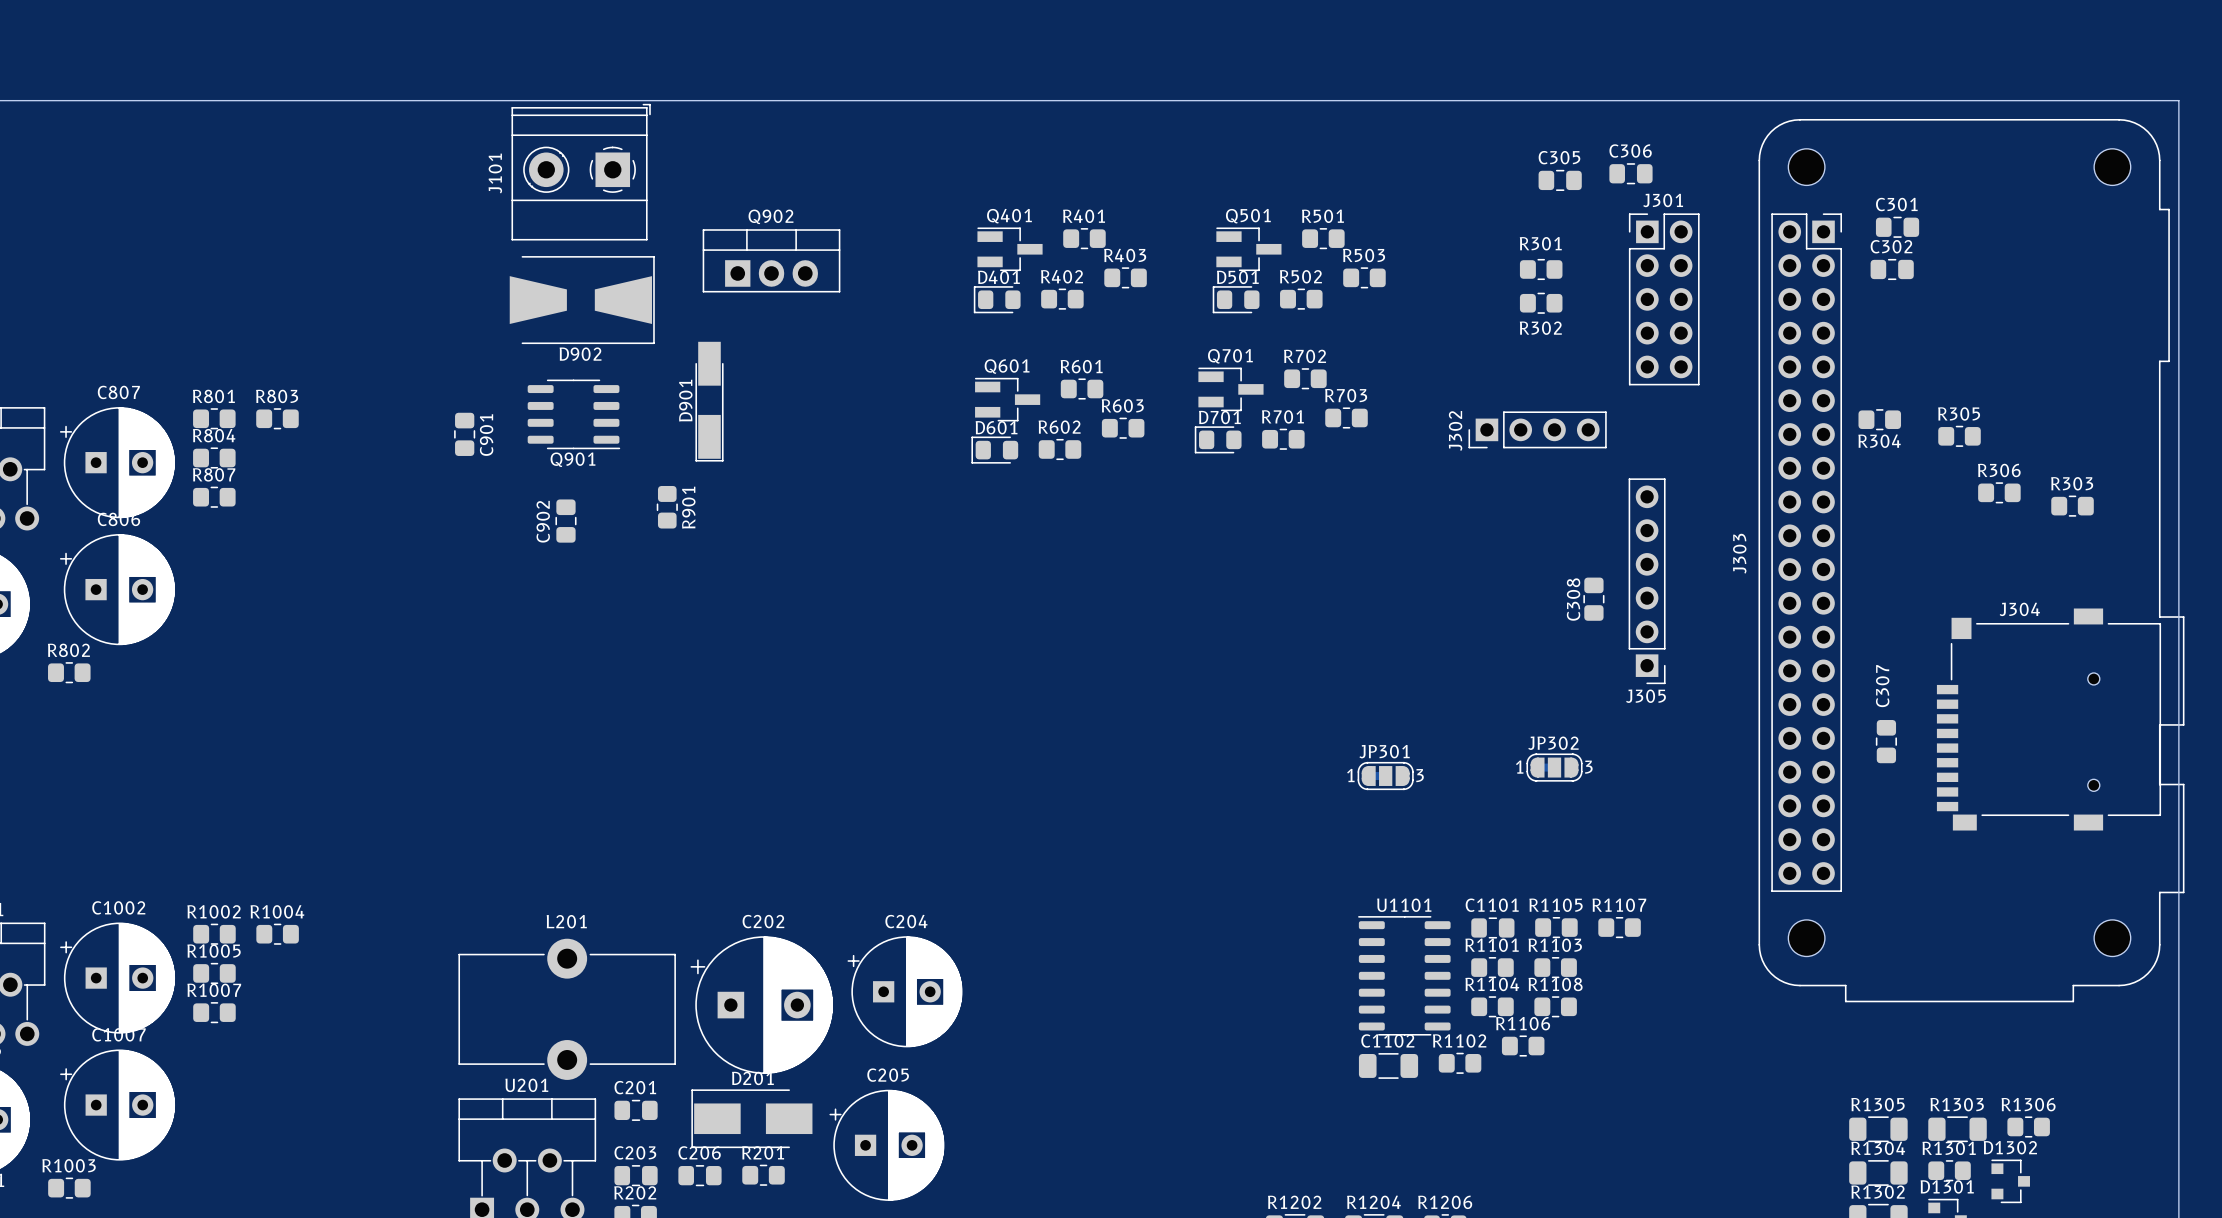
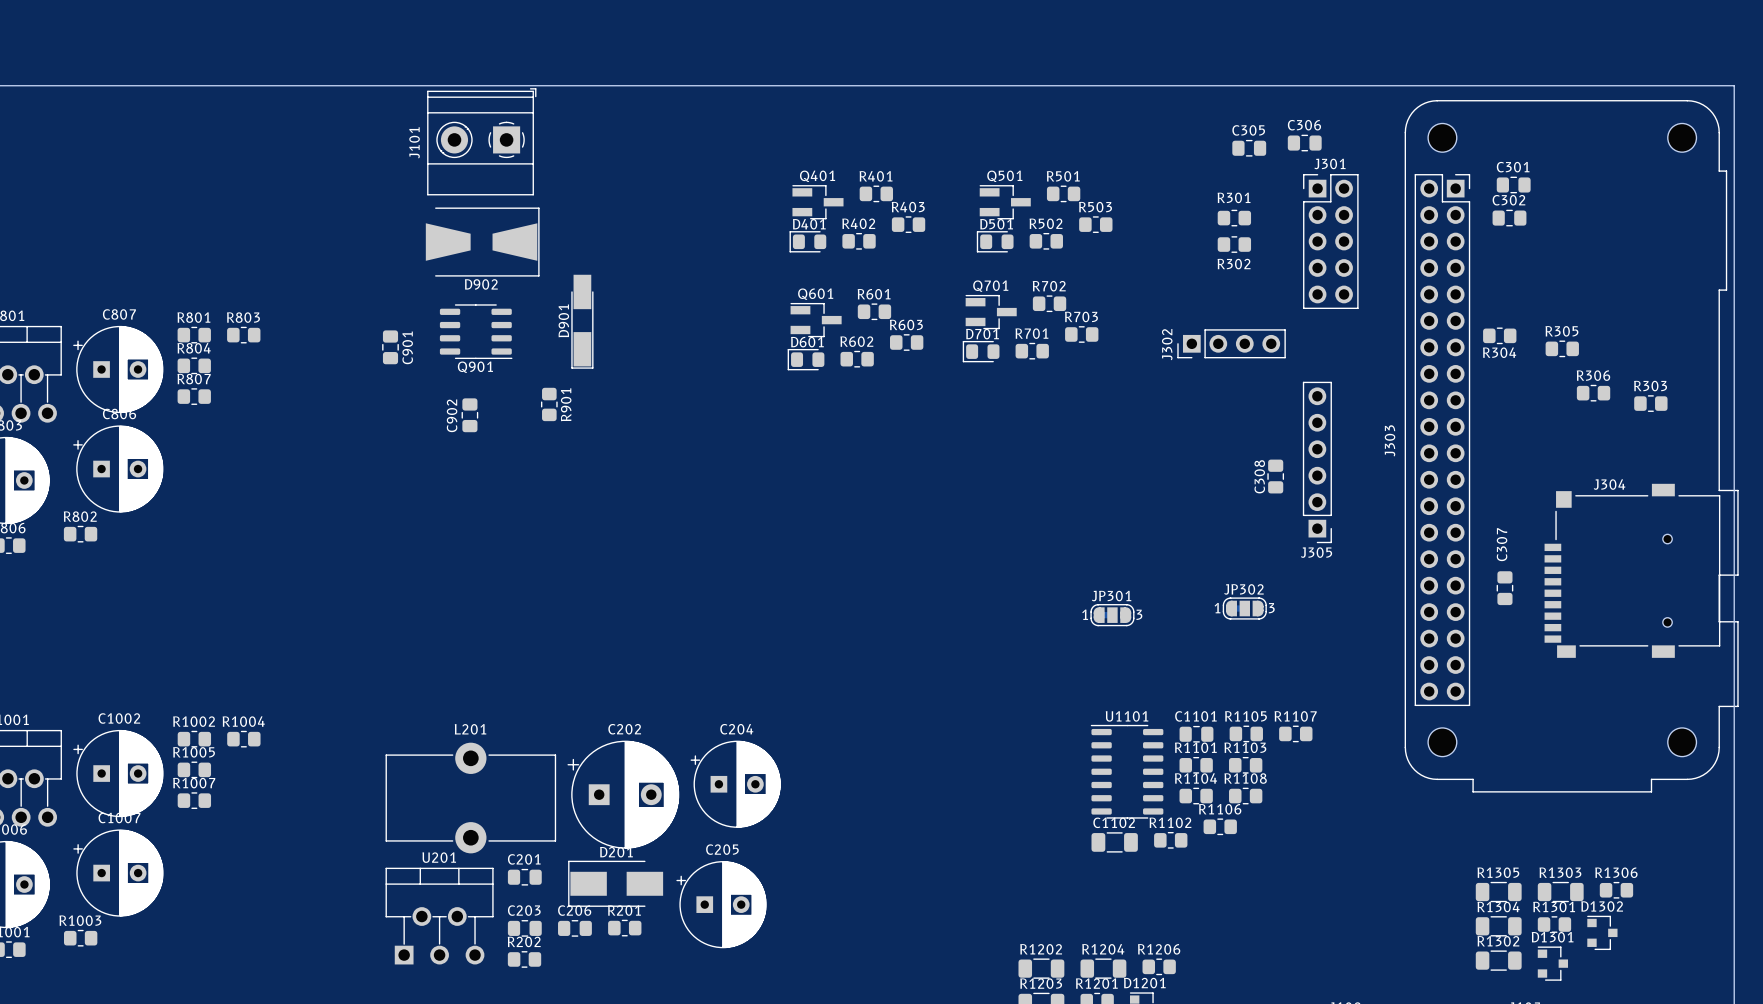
Q902: (771, 260) -> none

